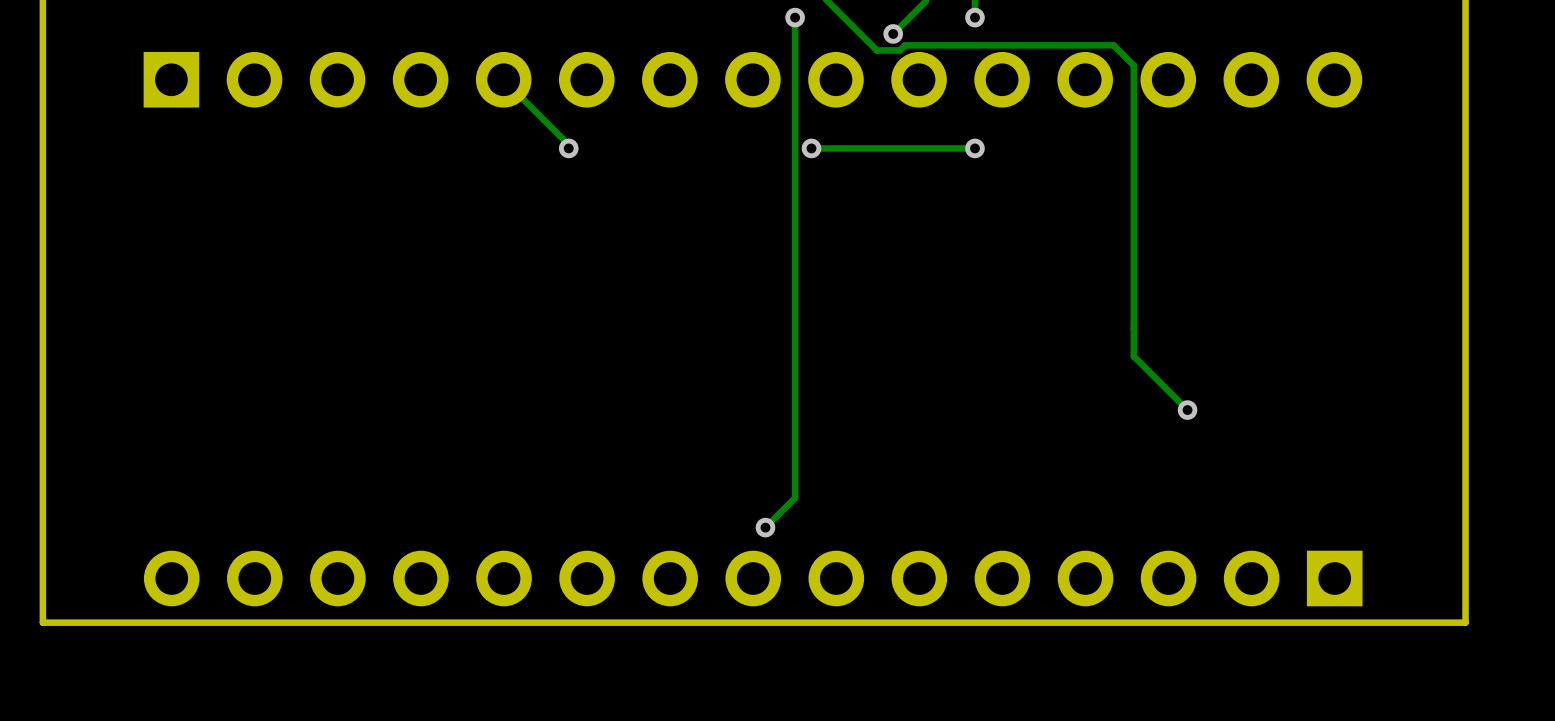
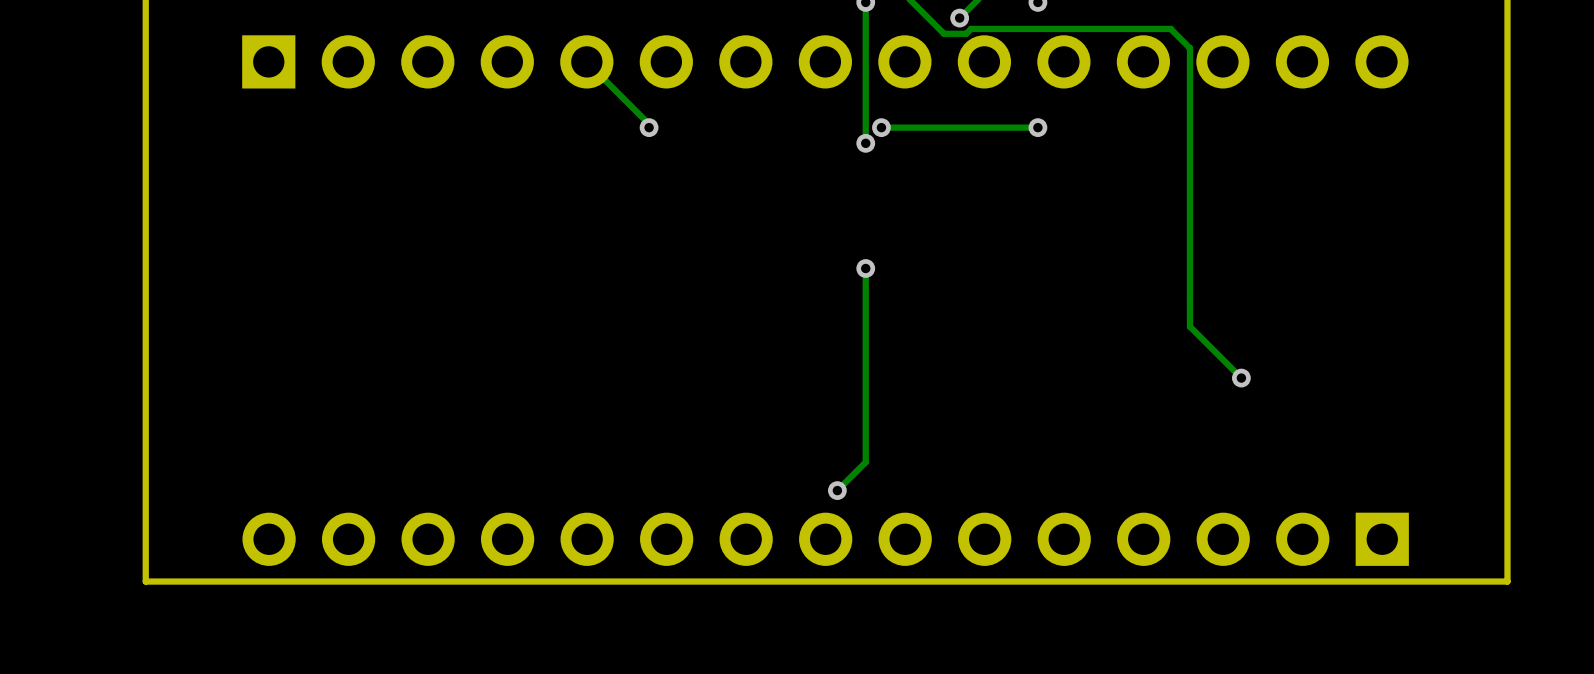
track: (795, 164) (795, 295) -> none
via: none -> (865, 143)
via: none -> (865, 268)

